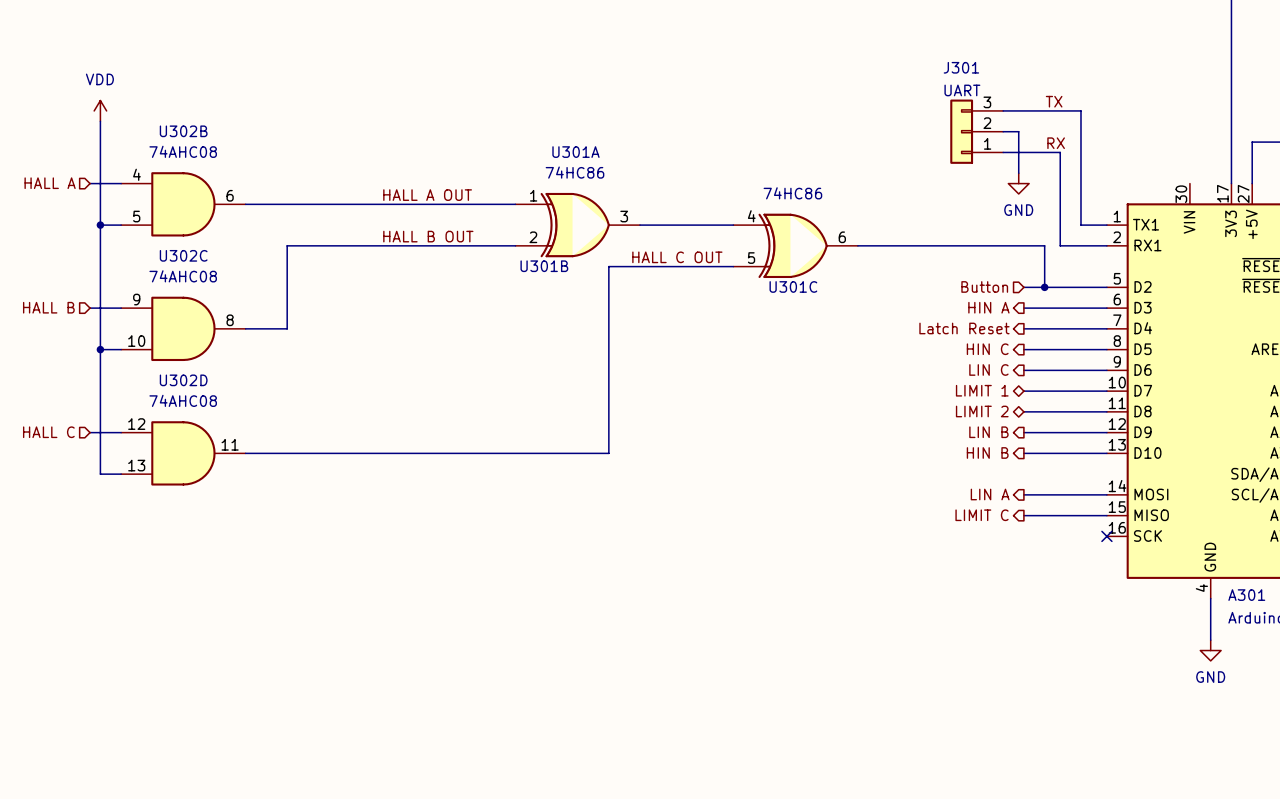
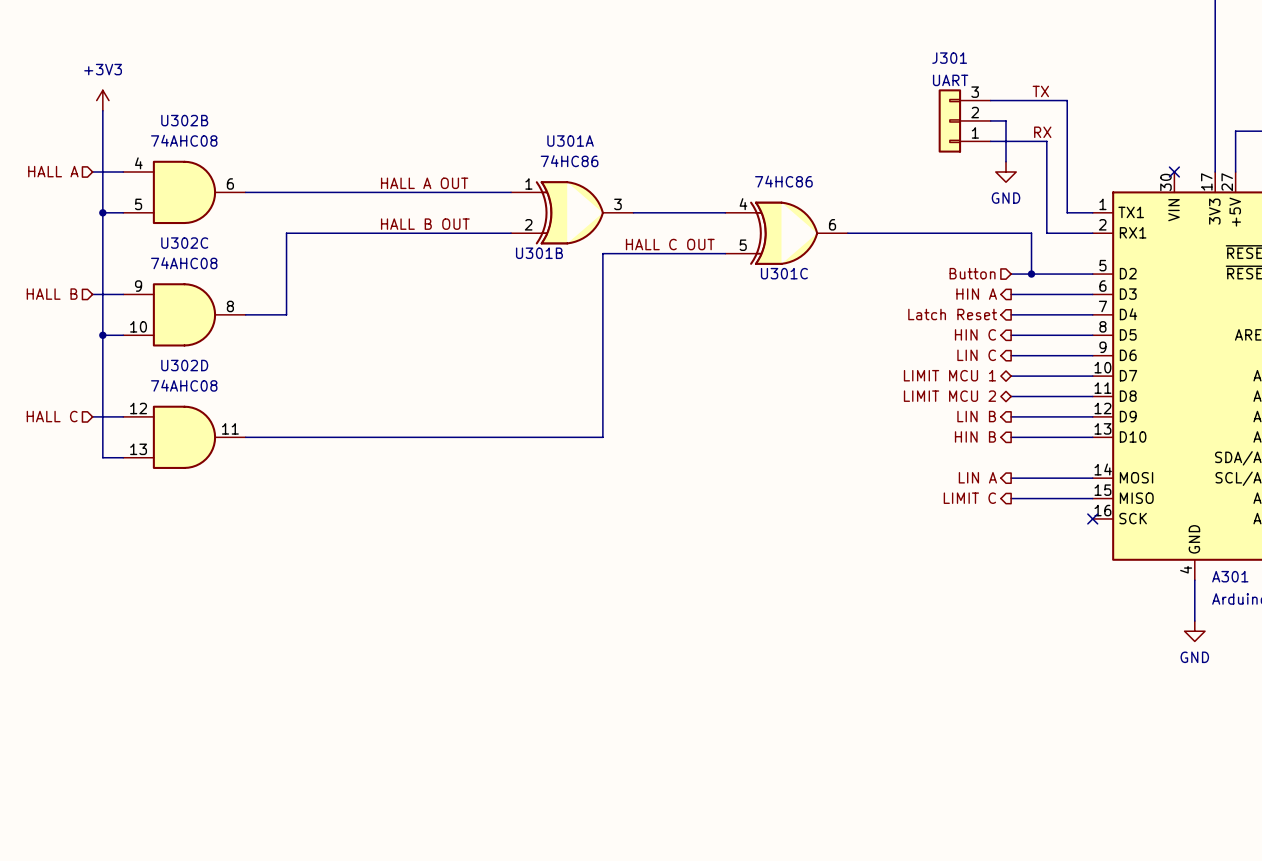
power symbol: VDD (100, 110) -> +3V3 (102, 100)
no-connect mark: none -> (1174, 171)
hierarchical label: LIMIT 1 (982, 390) -> LIMIT MCU 1 (949, 375)
hierarchical label: LIMIT 2 (982, 411) -> LIMIT MCU 2 (949, 396)

